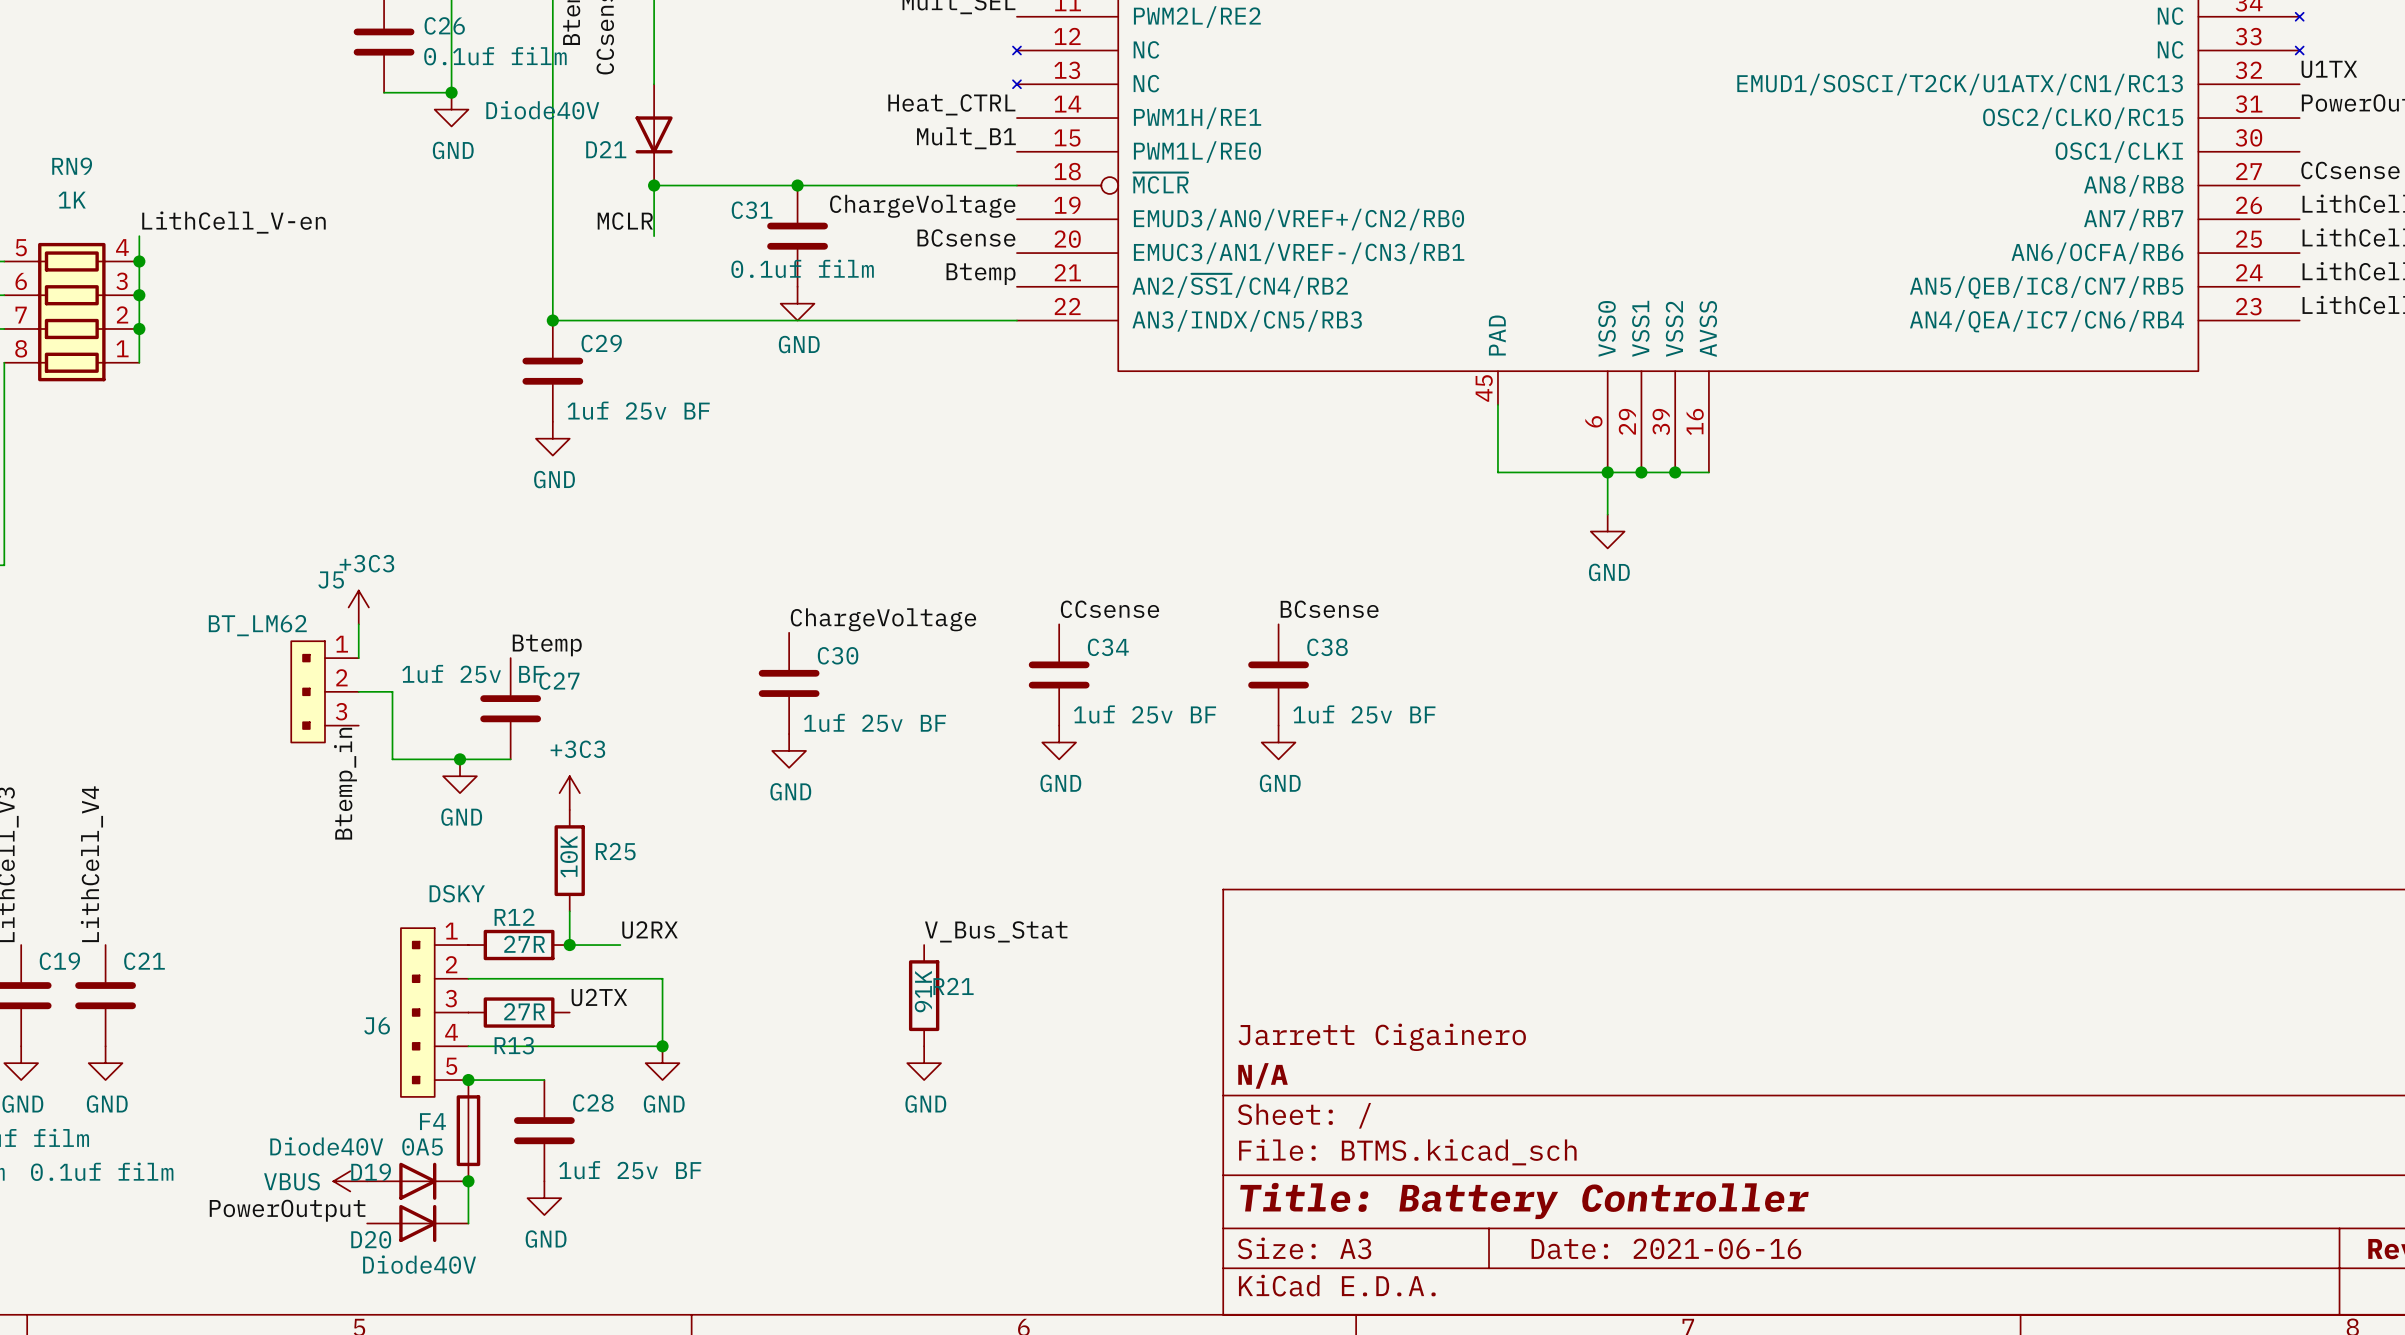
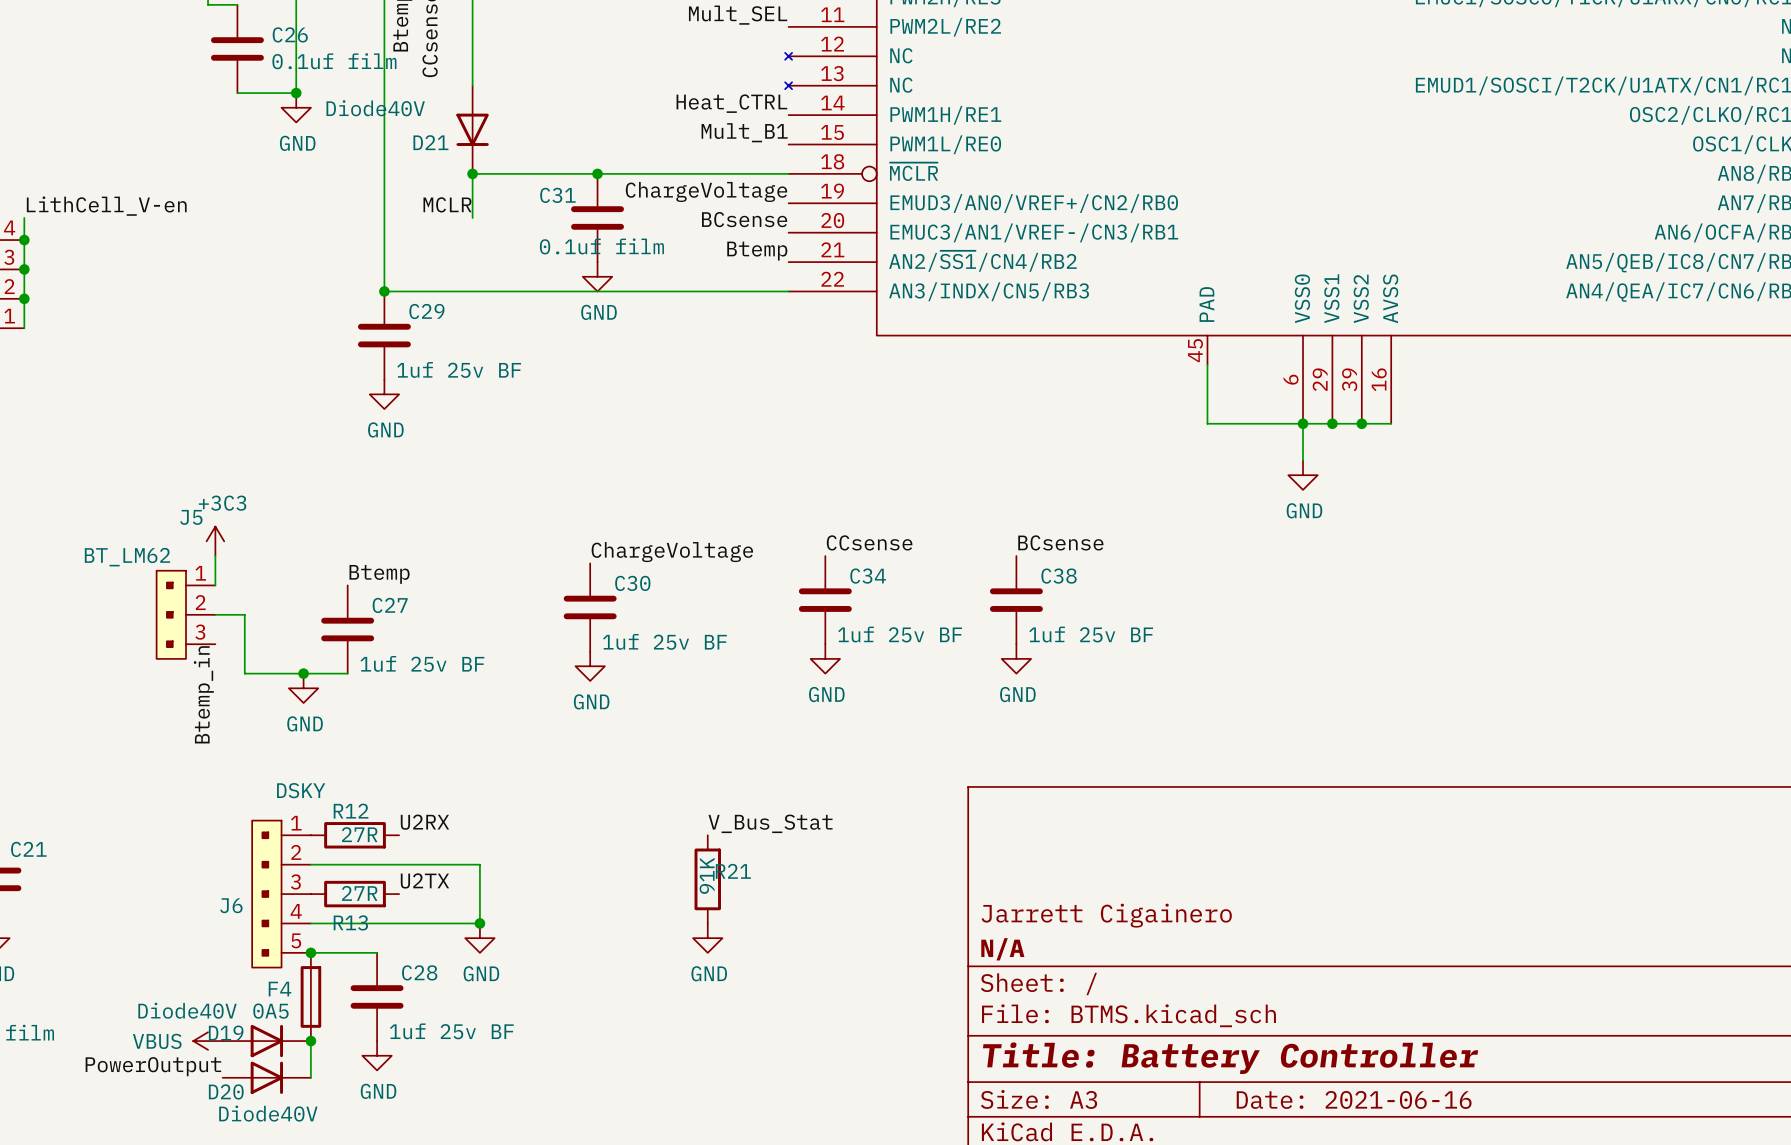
C27 value position: 1uf 25v BF (473, 673) -> 1uf 25v BF (422, 663)
power symbol: +3C3 (569, 793) -> none
R25: 10K (569, 860) -> none
wire: (569, 911) (569, 945) (620, 945) -> none
label position: U2RX (650, 929) -> U2RX (424, 822)
junction: (569, 945) -> none

